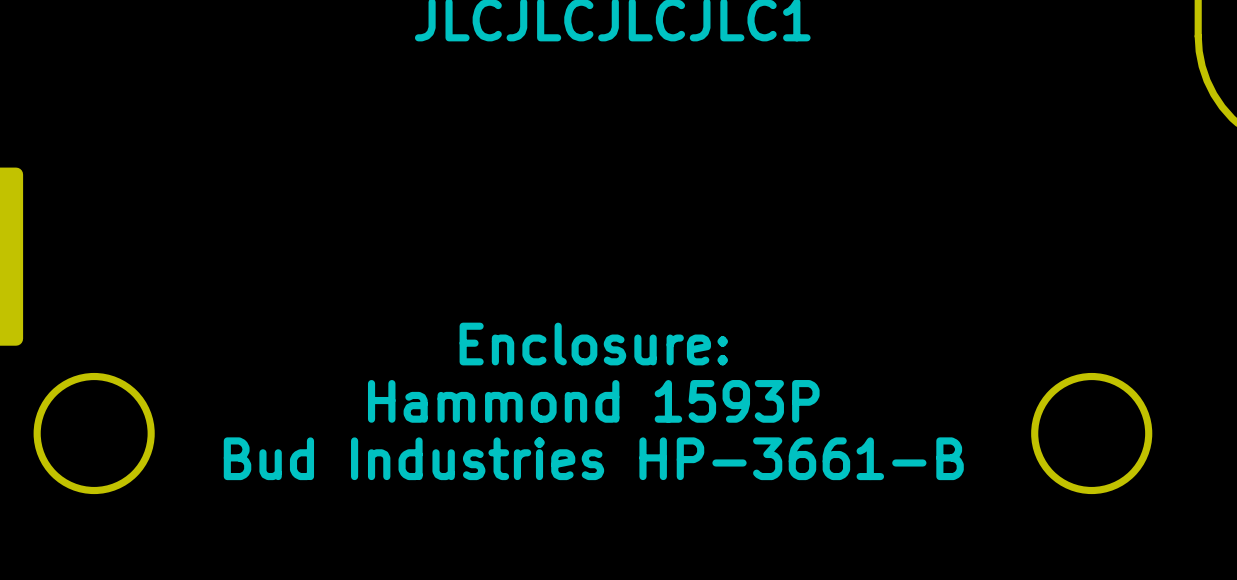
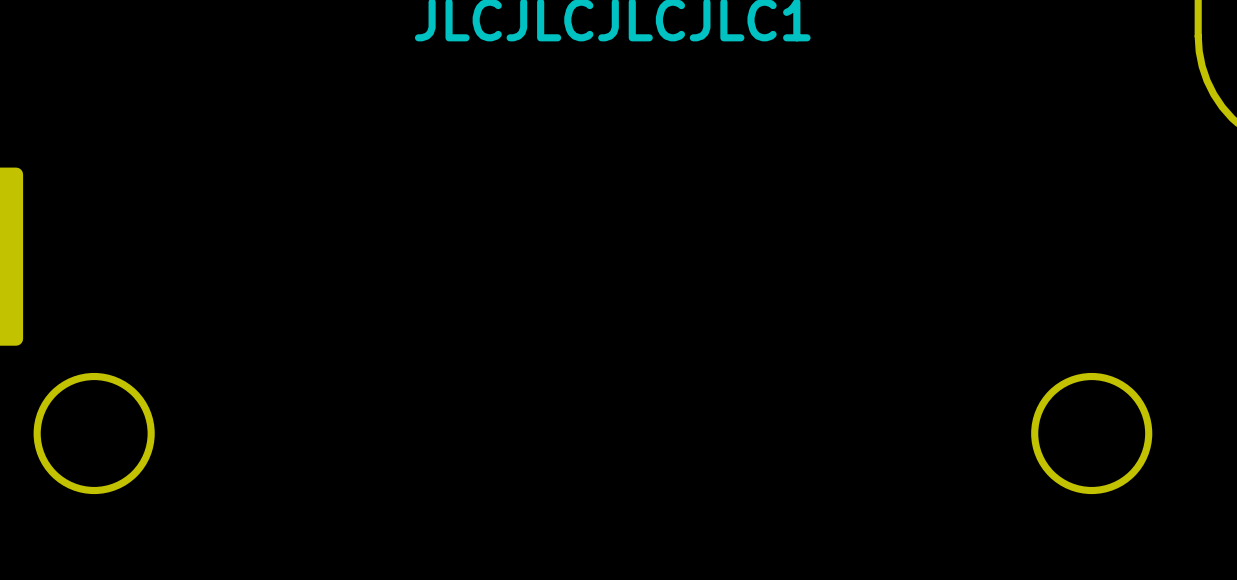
text: Enclosure: (593, 344) -> none
text: Hammond 1593P (593, 401) -> none
text: Bud Industries HP-3661-B (593, 458) -> none

